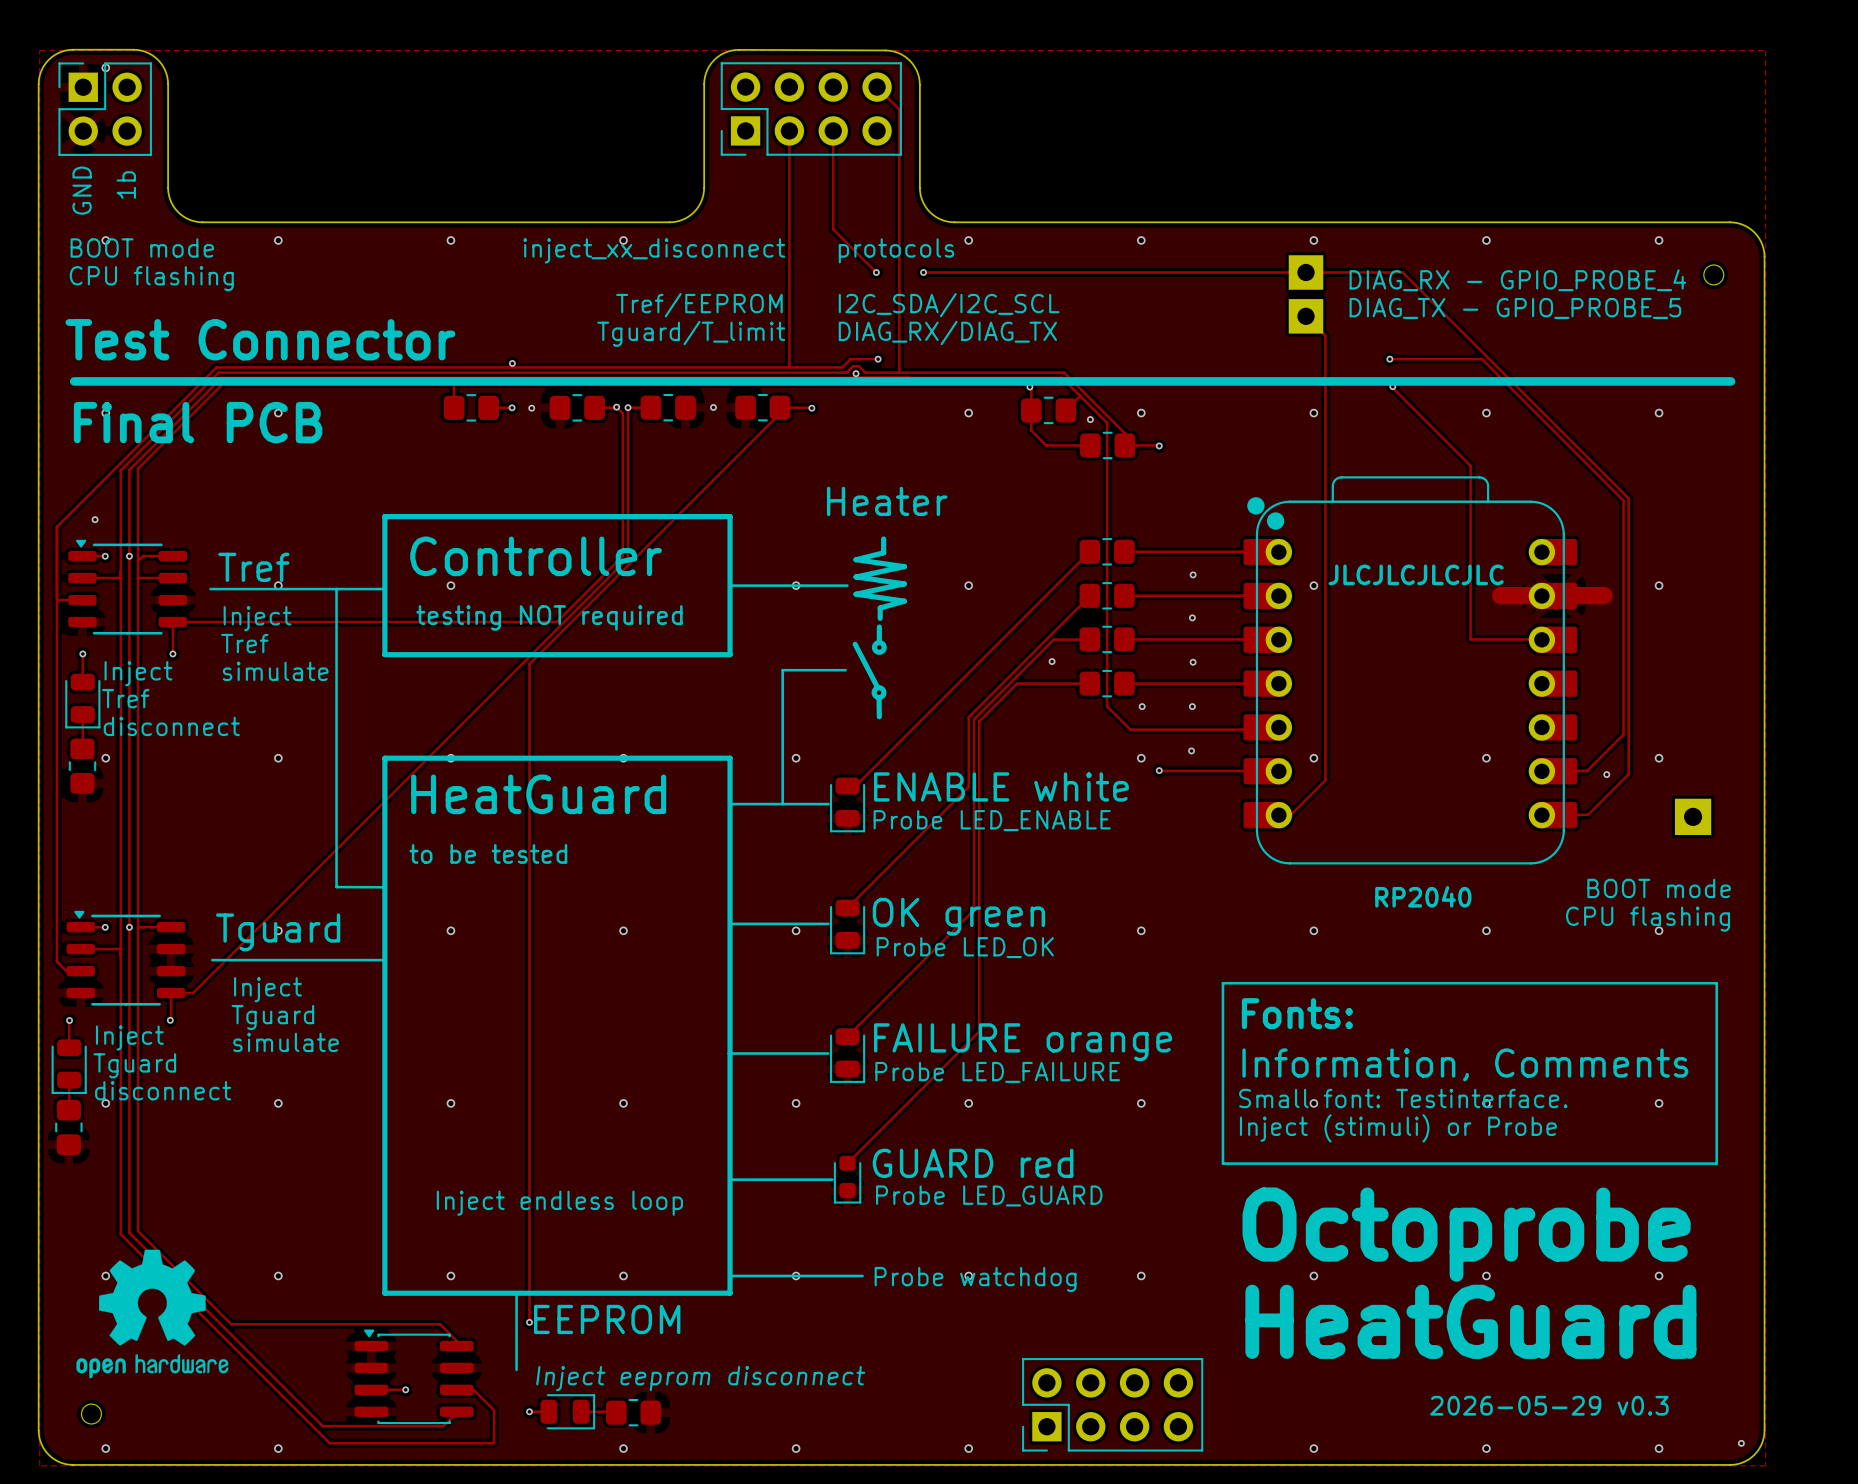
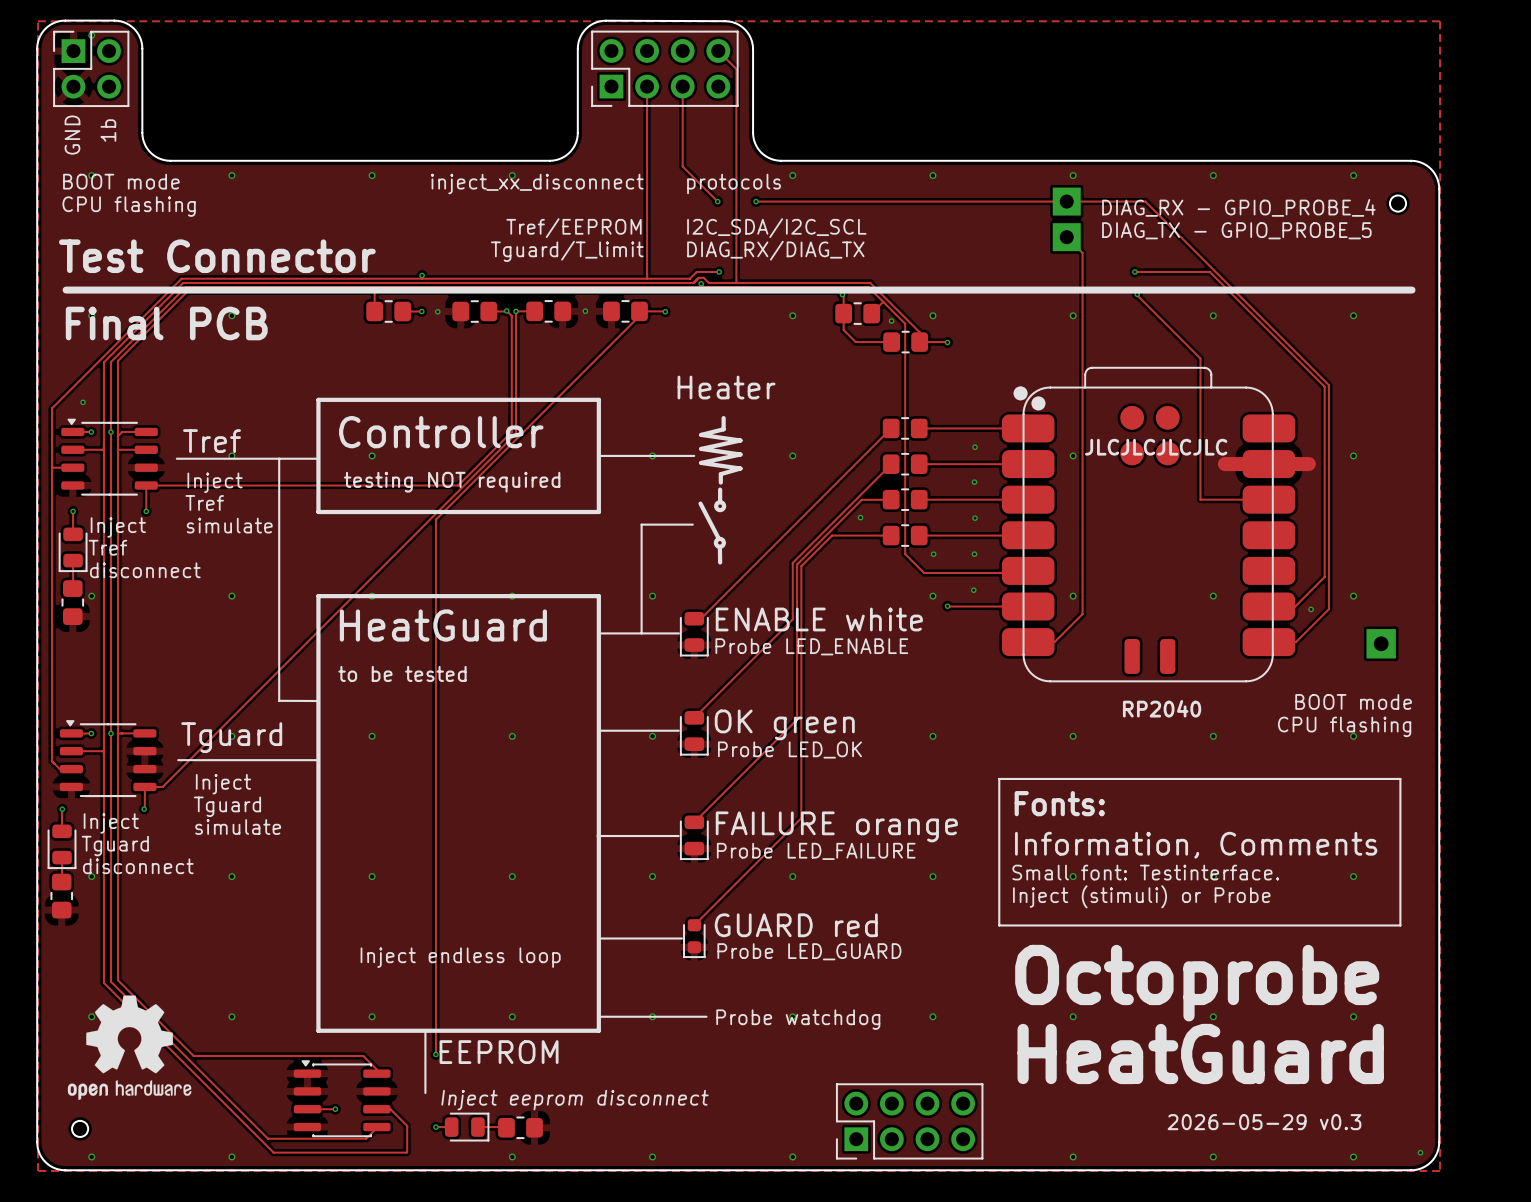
part footprint: [1243, 476, 1578, 865] -> [1001, 366, 1296, 683]

